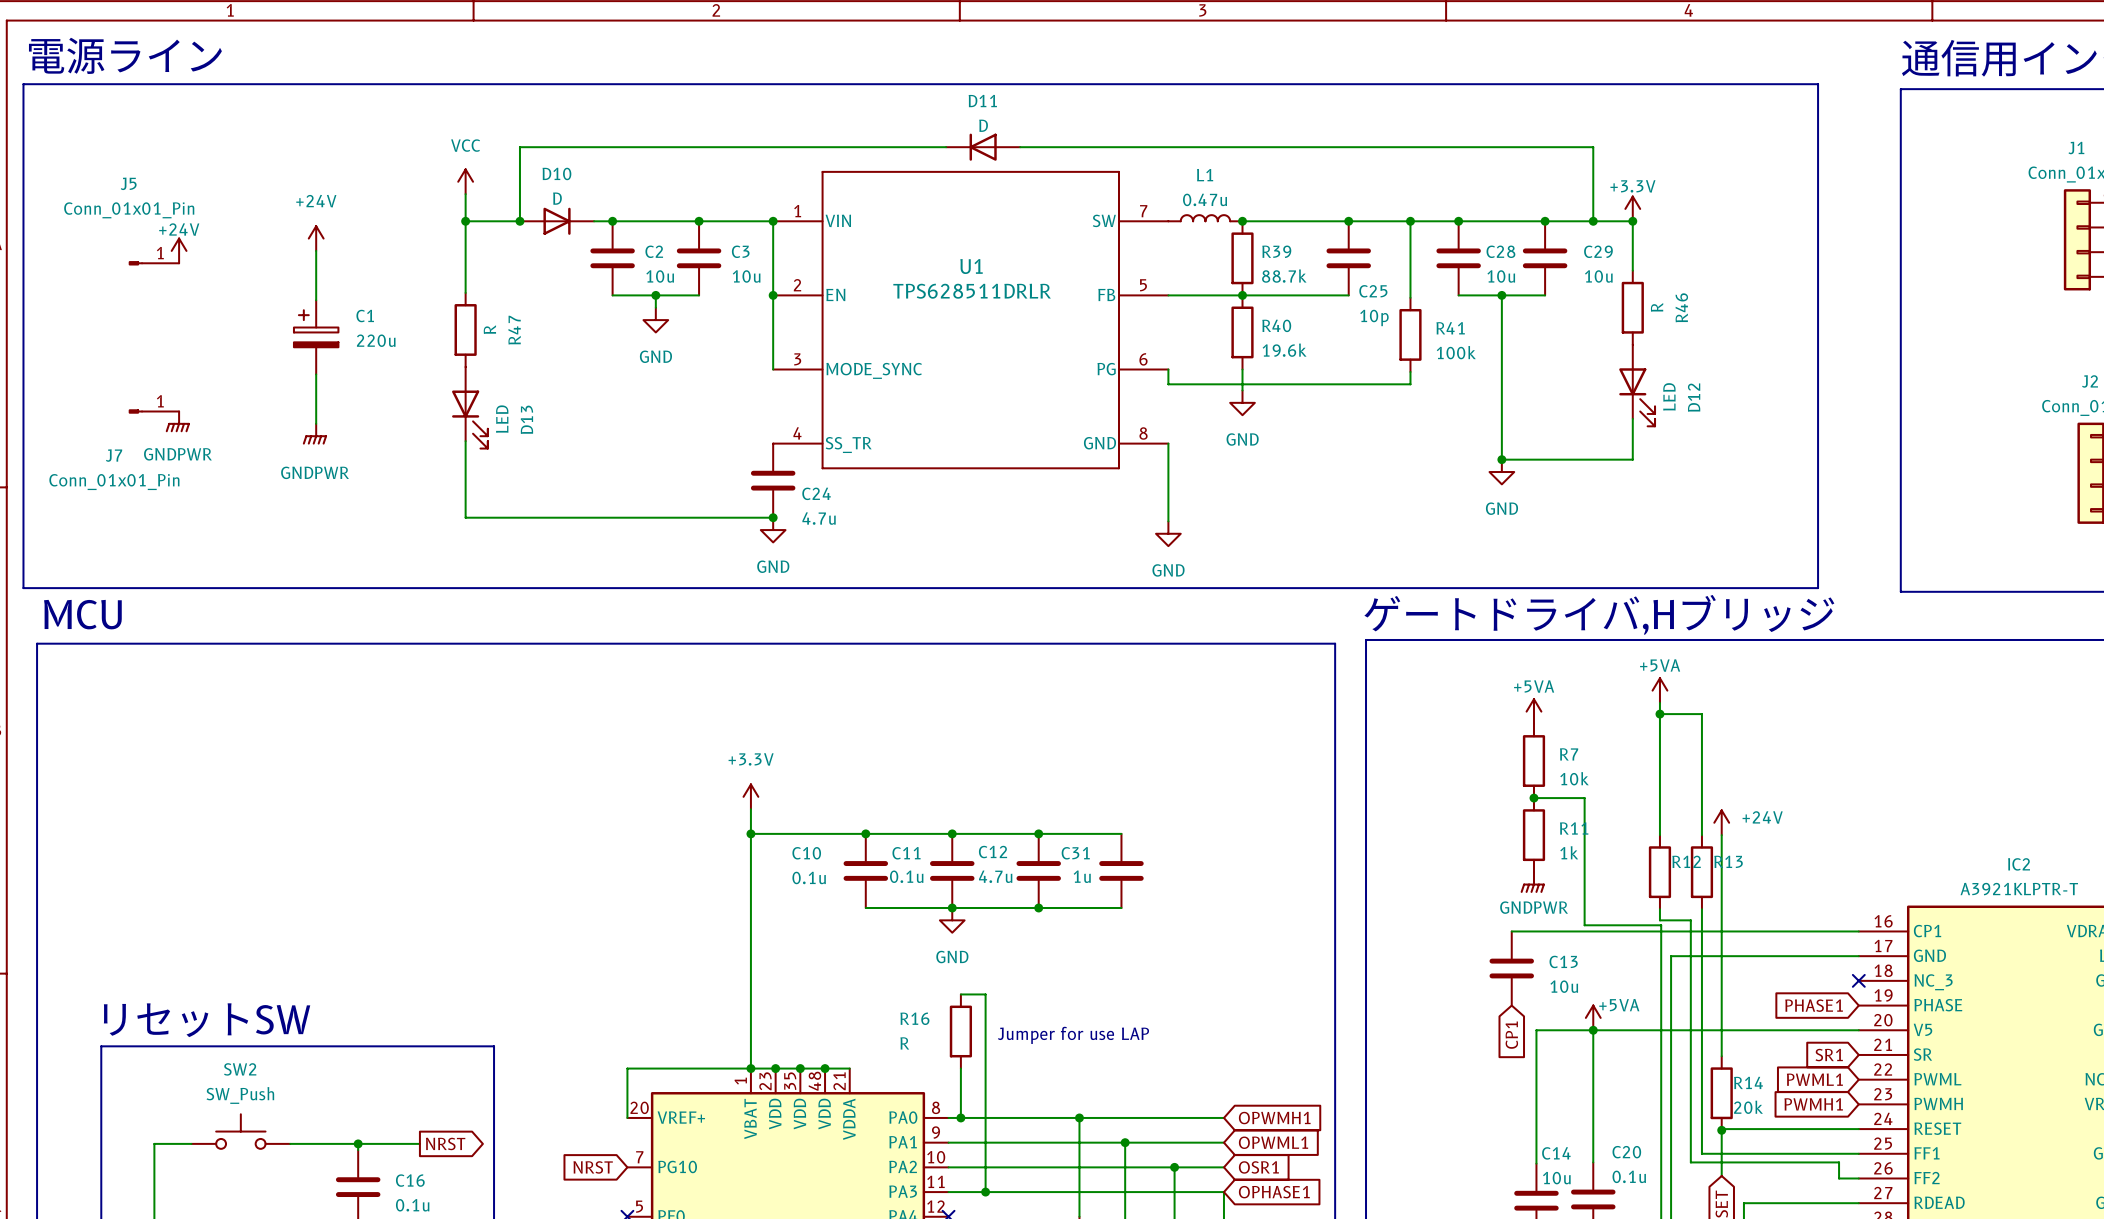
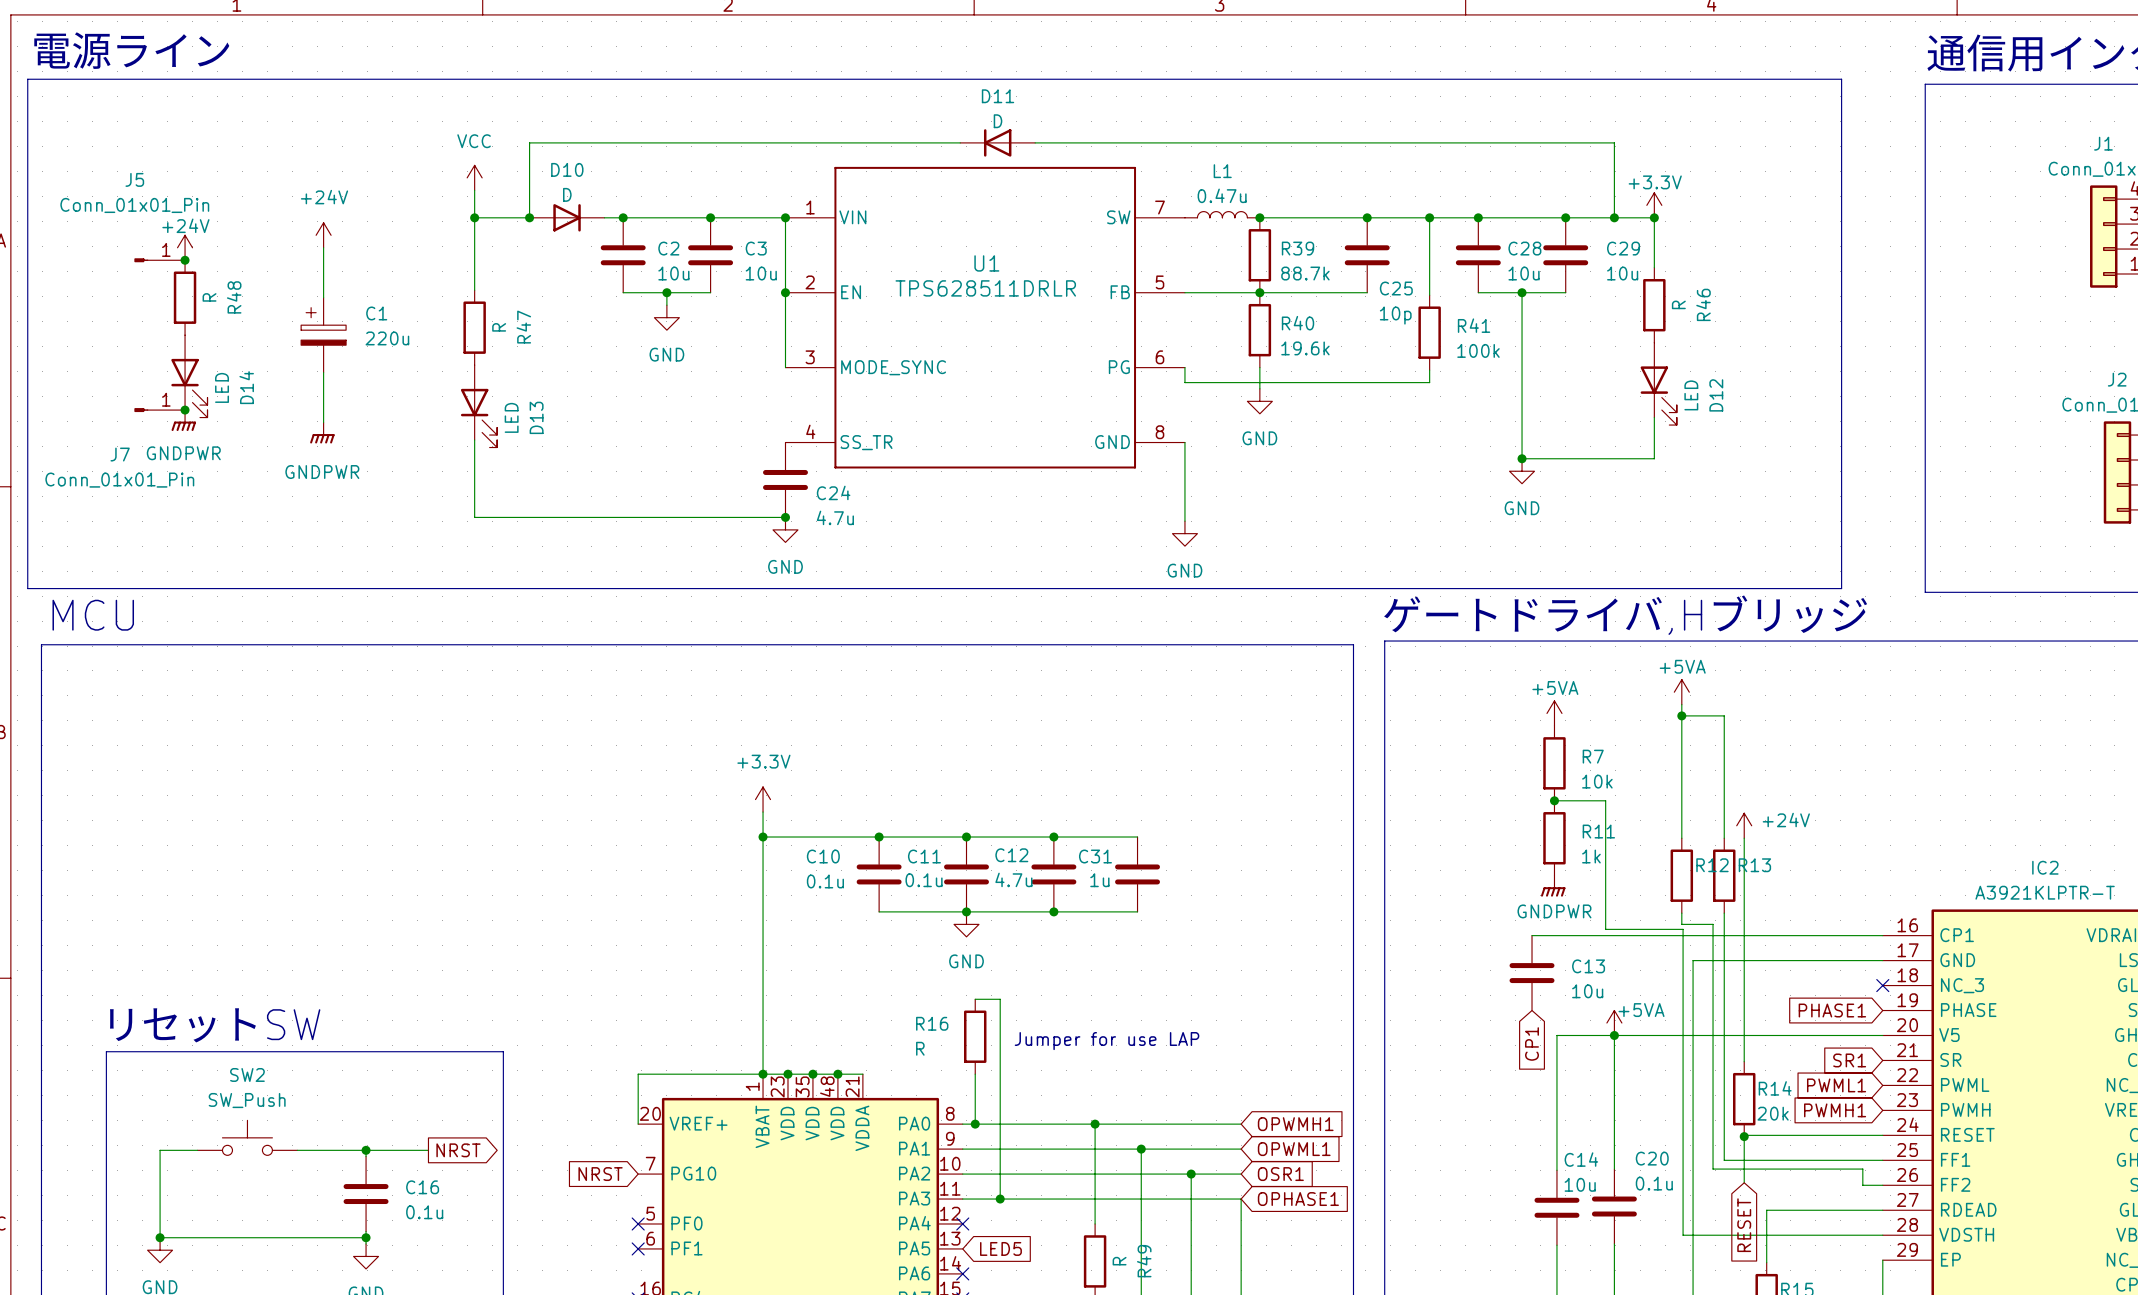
junction: none -> (185, 260)
R48: none -> R (185, 297)
D14: none -> LED (189, 376)
junction: none -> (185, 410)

